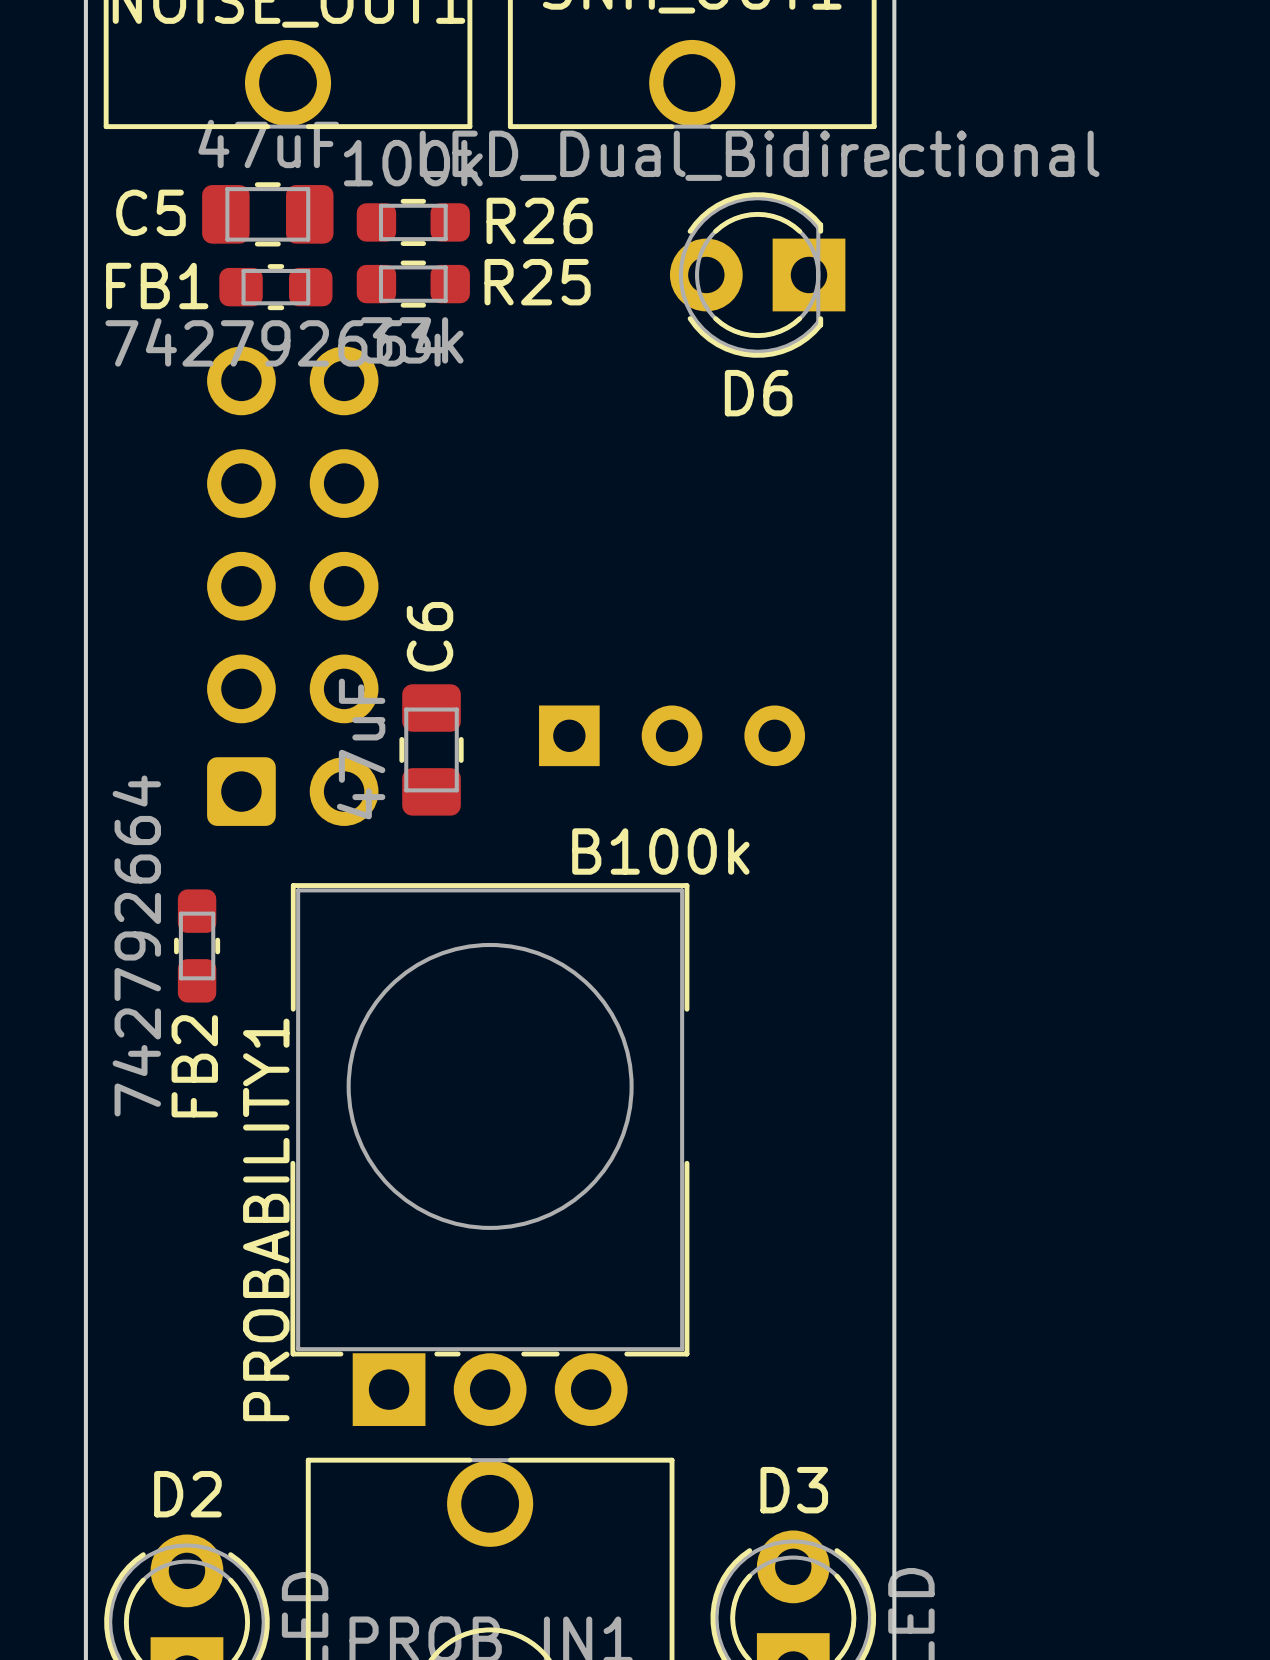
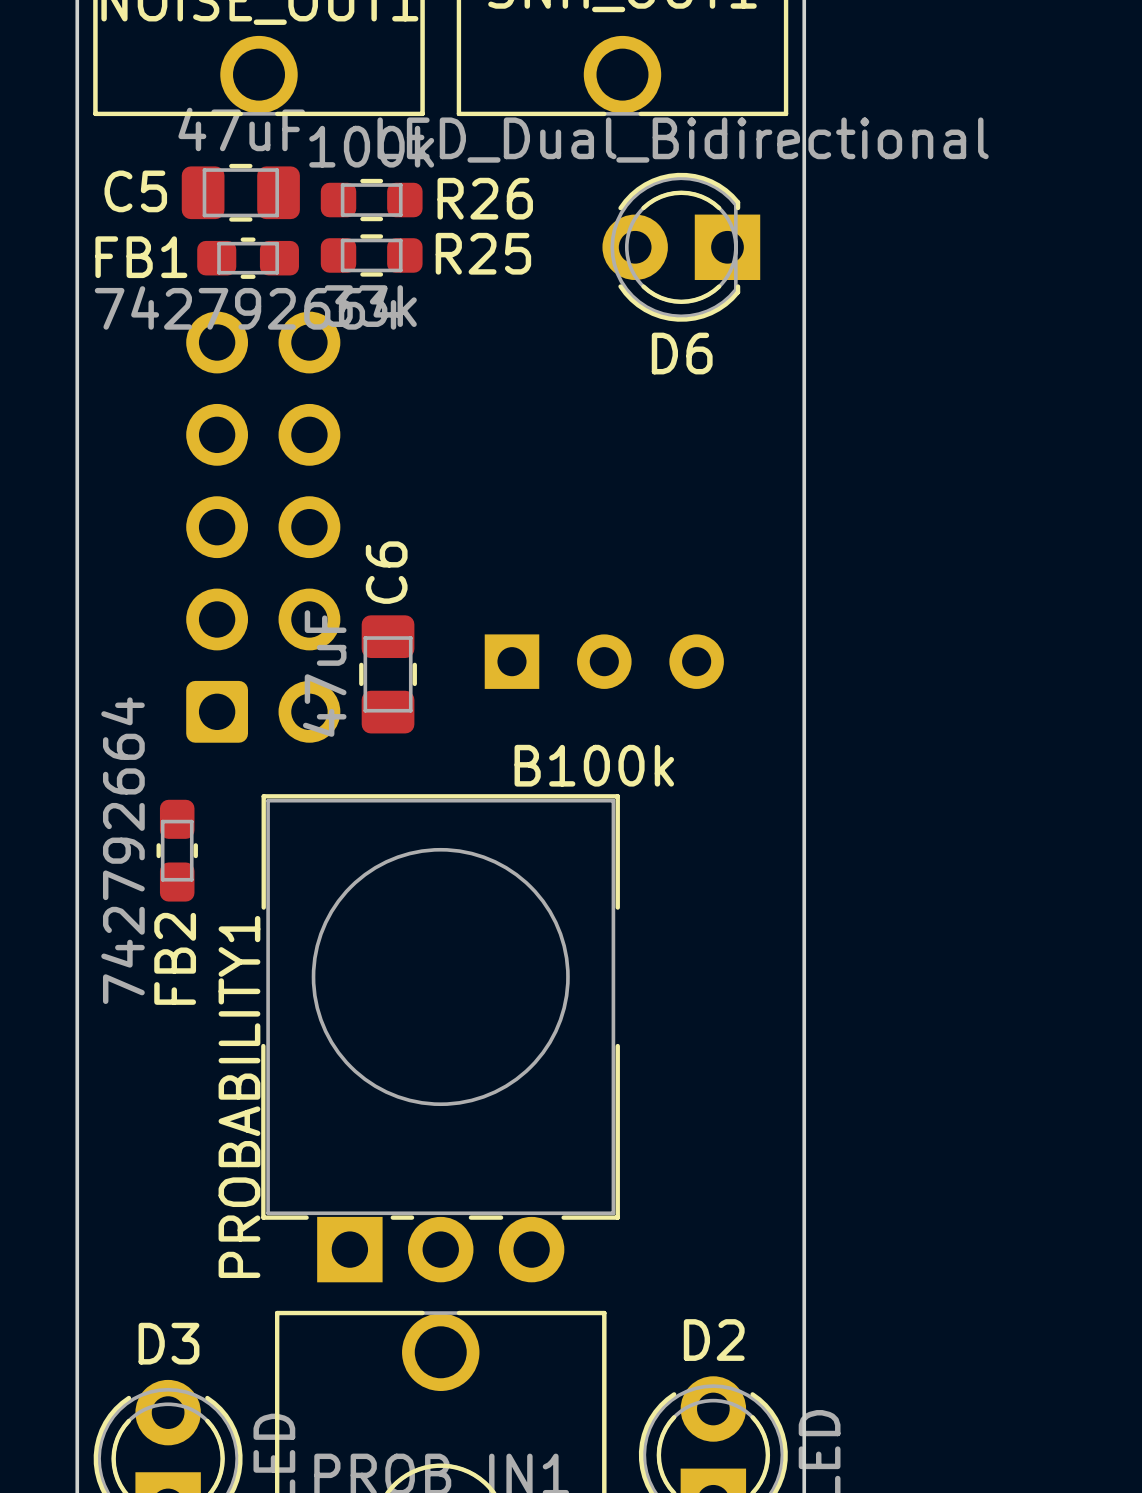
D3 name: D3 (794, 1490) -> D2 (714, 1340)
D2 name: D2 (187, 1494) -> D3 (169, 1343)

